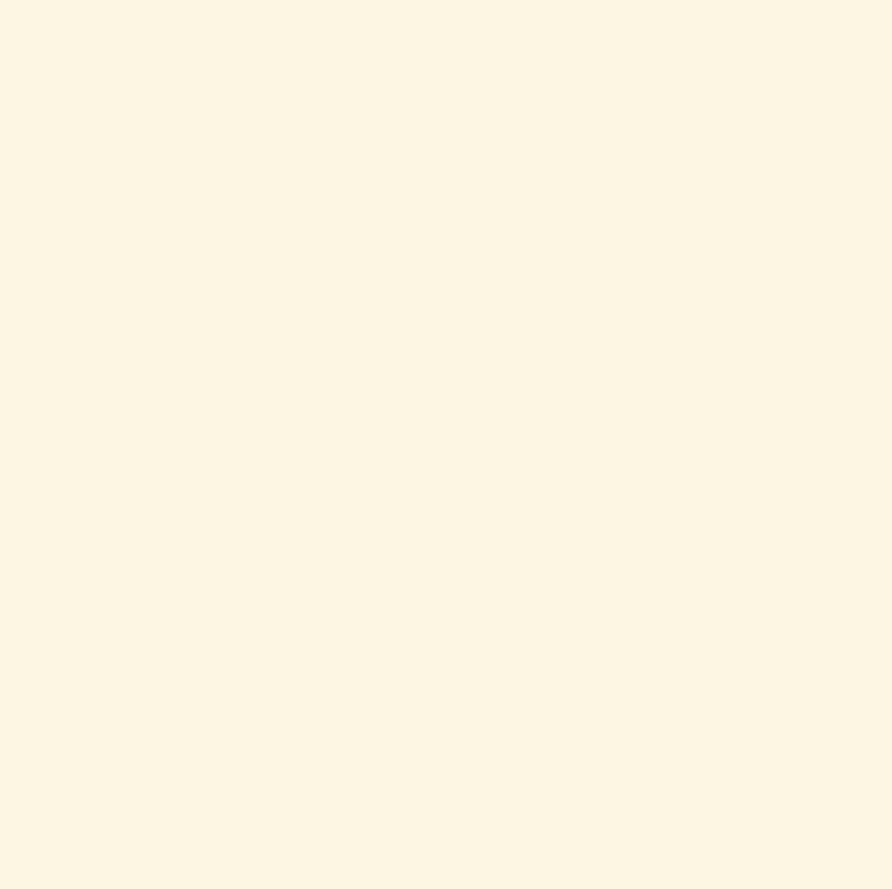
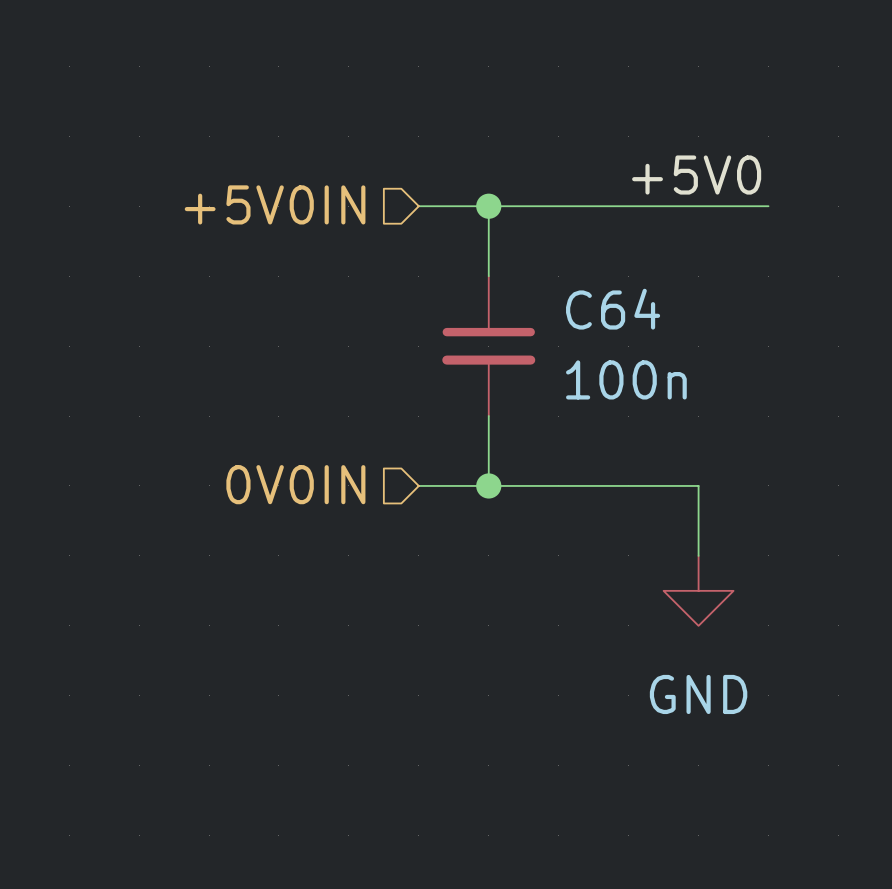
label: none -> +5V0 (696, 175)
hierarchical label: none -> +5V0IN (275, 204)
wire: none -> (418, 206) (768, 206)
wire: none -> (488, 206) (488, 276)
junction: none -> (488, 206)
C64: none -> 100n (488, 346)
wire: none -> (488, 416) (488, 485)
hierarchical label: none -> 0V0IN (295, 484)
wire: none -> (418, 485) (698, 485) (698, 555)
junction: none -> (488, 485)
power symbol: none -> GND (698, 590)

